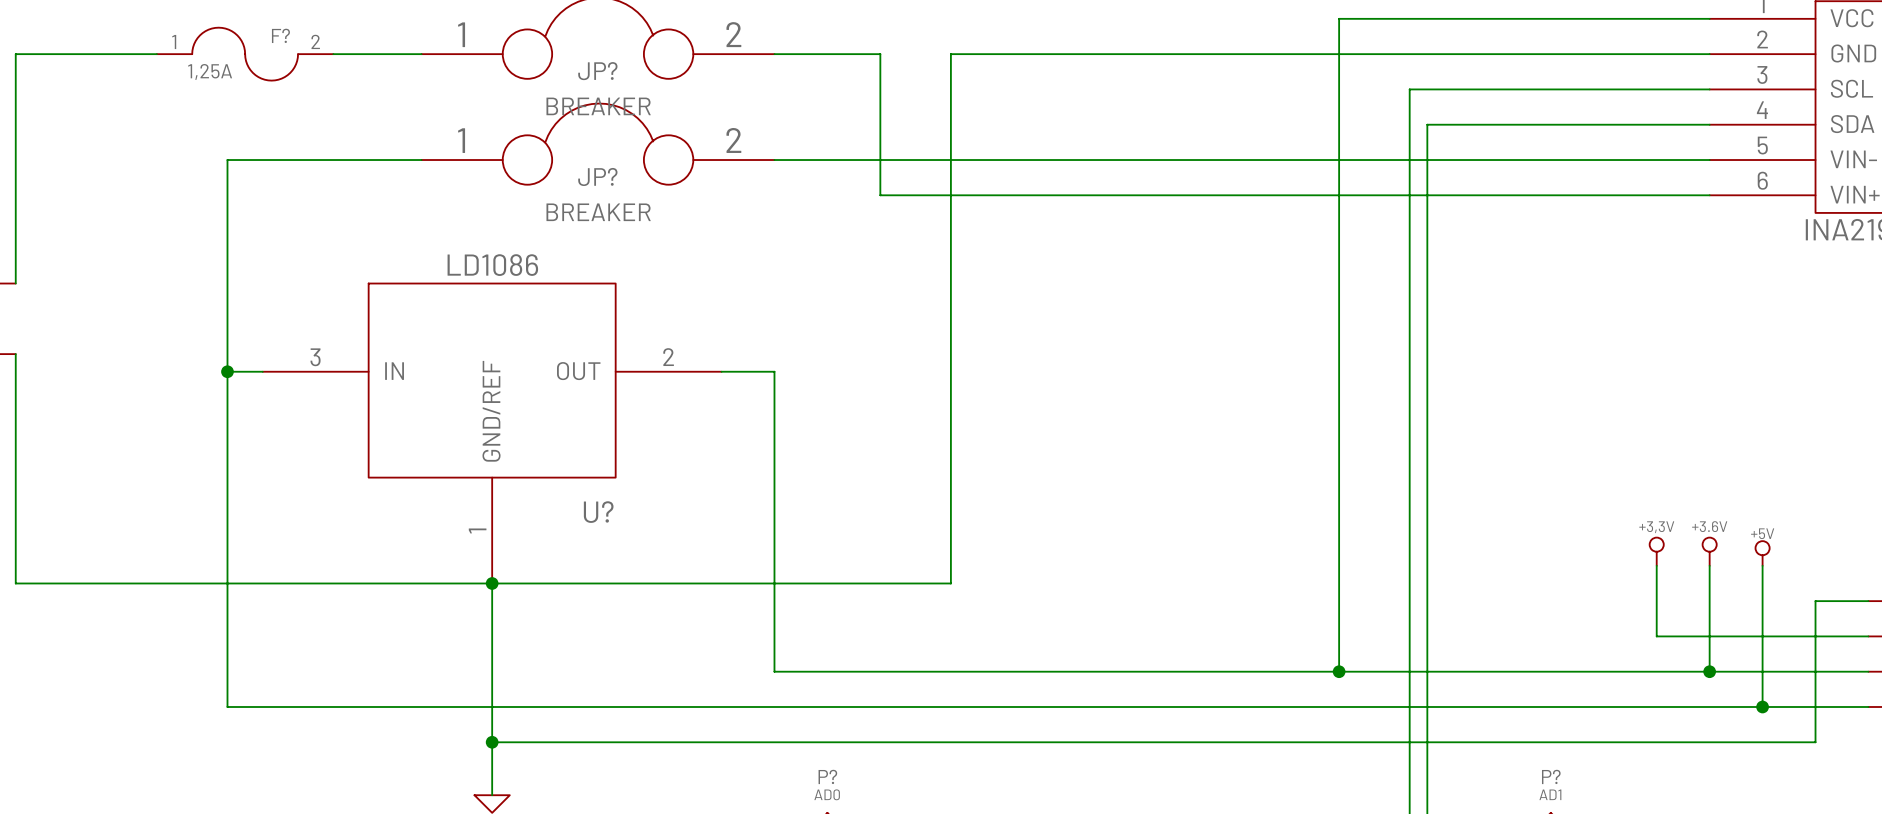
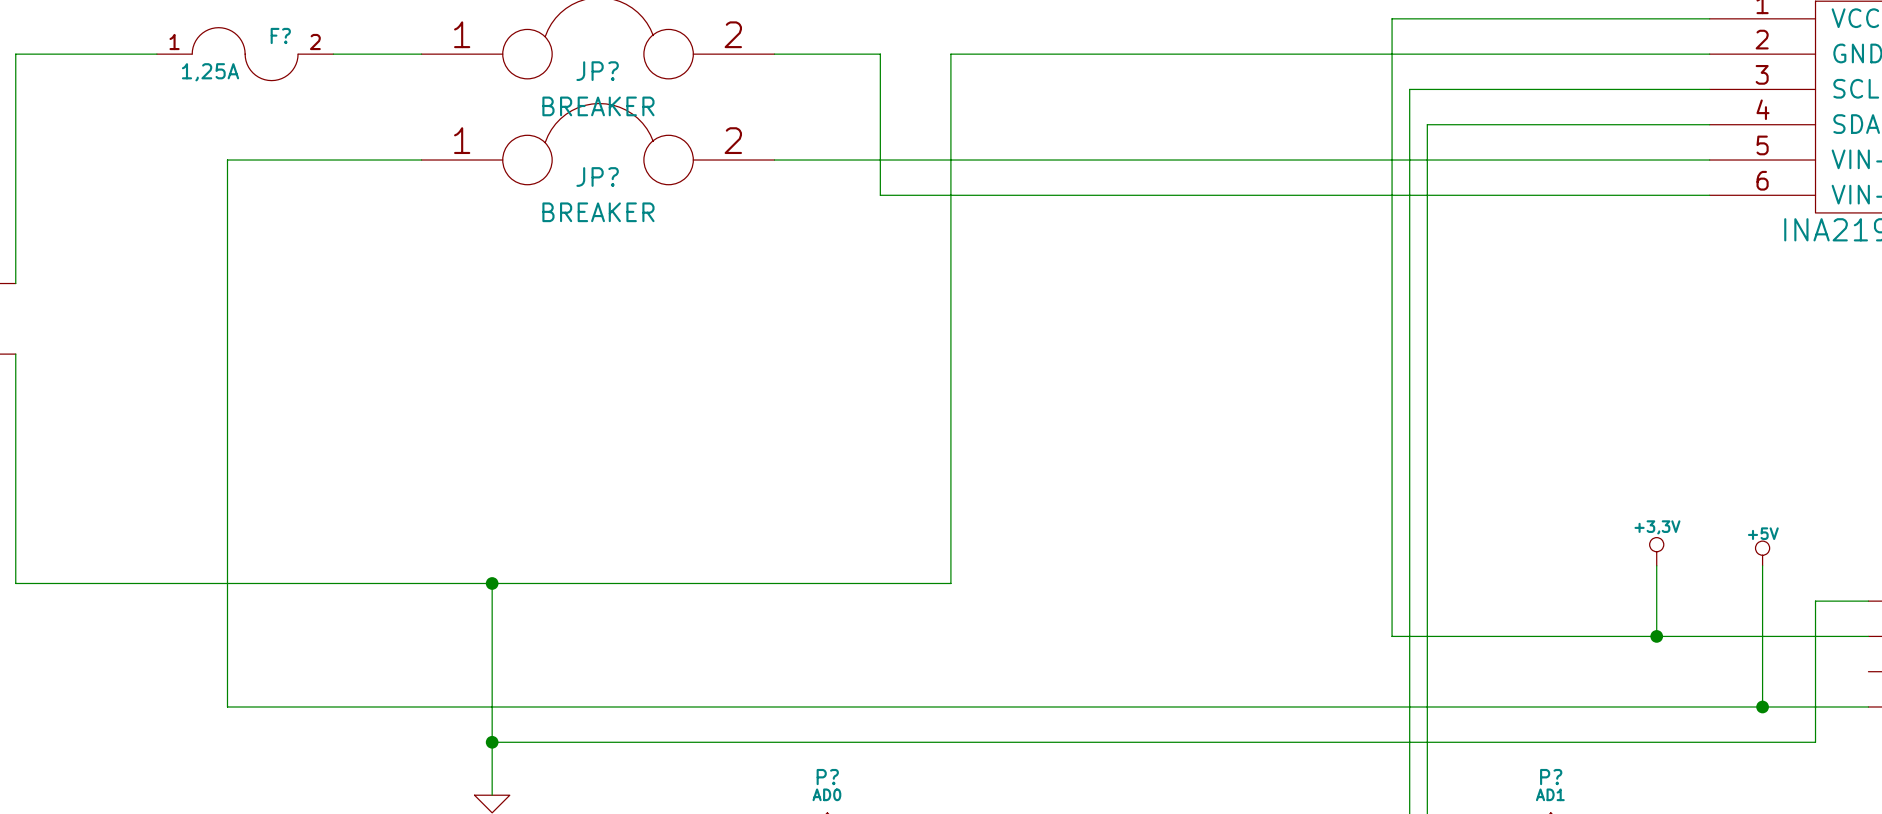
wire: (1392, 18) (1339, 18) (1339, 671) -> (1392, 18) (1392, 636) (1656, 636)
wire: (227, 371) (262, 371) -> none
junction: (227, 371) -> none
wire: (721, 371) (774, 371) (774, 671) (1868, 671) -> none
U?: LD1086 (492, 433) -> none
power symbol: +3.6V (1709, 551) -> none
wire: (1709, 565) (1709, 671) -> none
junction: (1339, 671) -> none
junction position: (1709, 671) -> (1656, 636)

